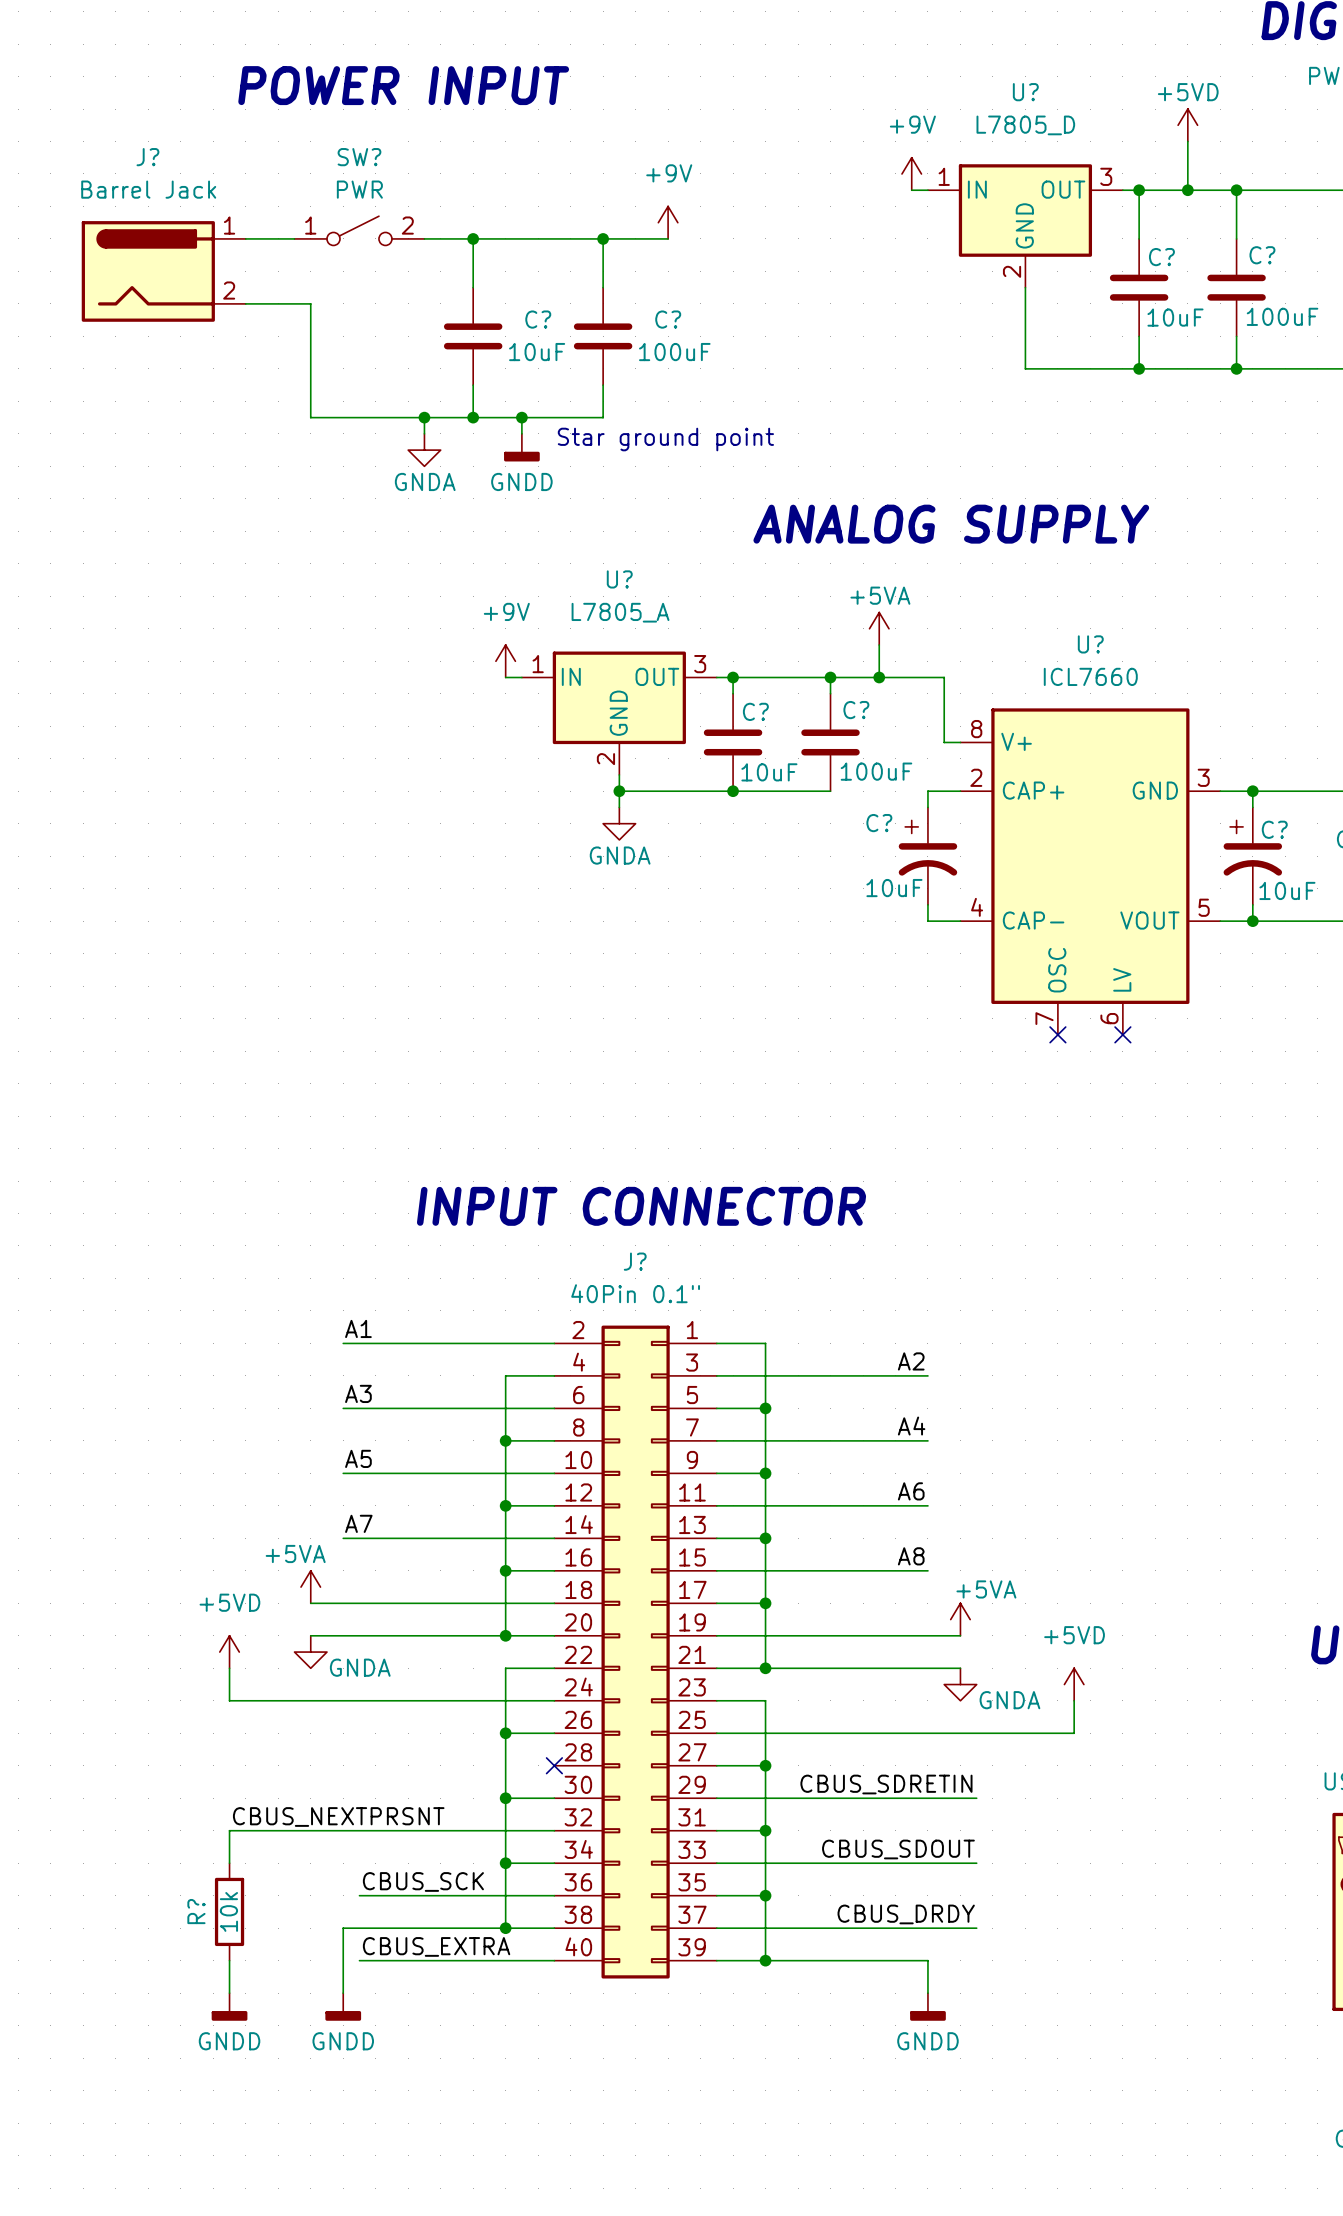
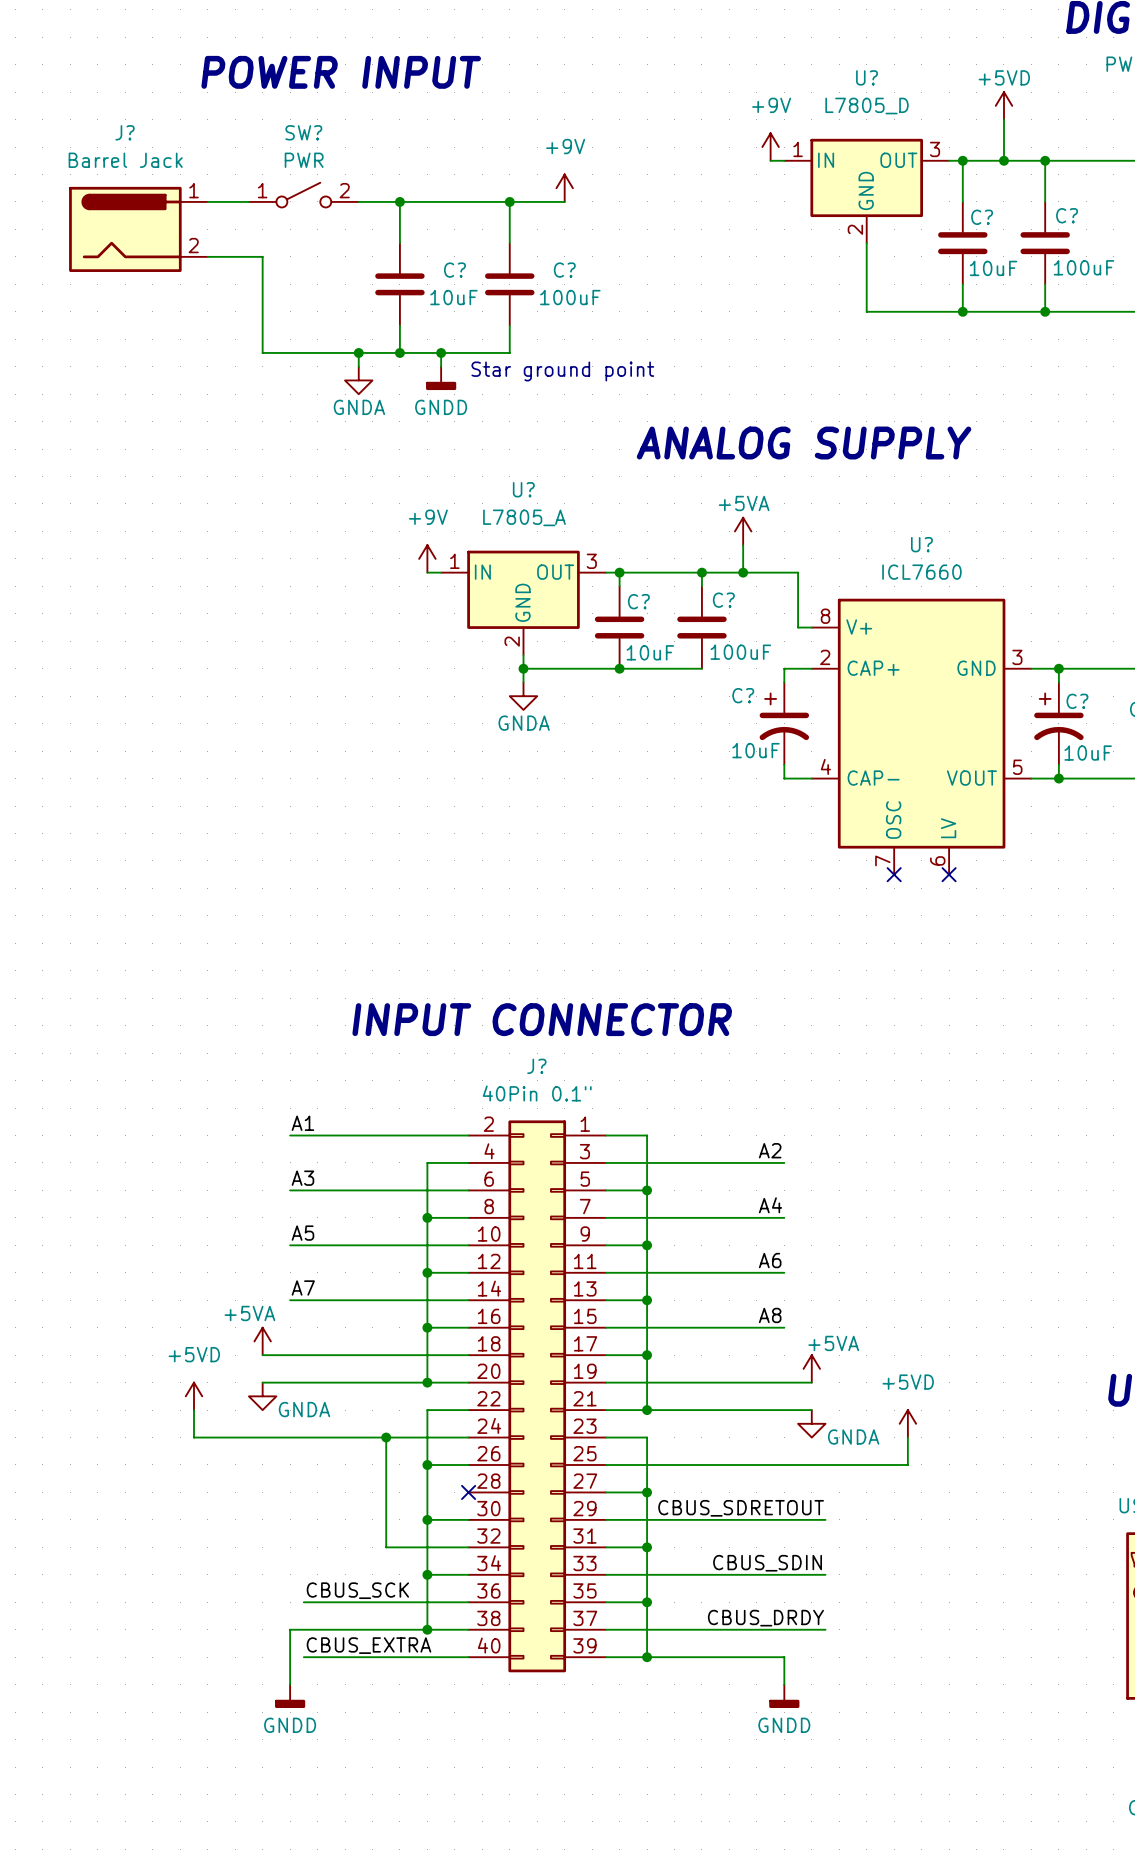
junction: none -> (386, 1437)
label: CBUS_SDRETIN (886, 1784) -> CBUS_SDRETOUT (741, 1508)
label: CBUS_NEXTPRSNT (338, 1817) -> none
wire: (456, 1830) (229, 1830) (229, 1863) -> (386, 1547) (386, 1437)
label: CBUS_SDOUT (898, 1849) -> CBUS_SDIN (767, 1563)
R?: 10k (229, 1911) -> none
wire: (229, 1960) (229, 1993) -> none
power symbol: GNDD (229, 2006) -> none

